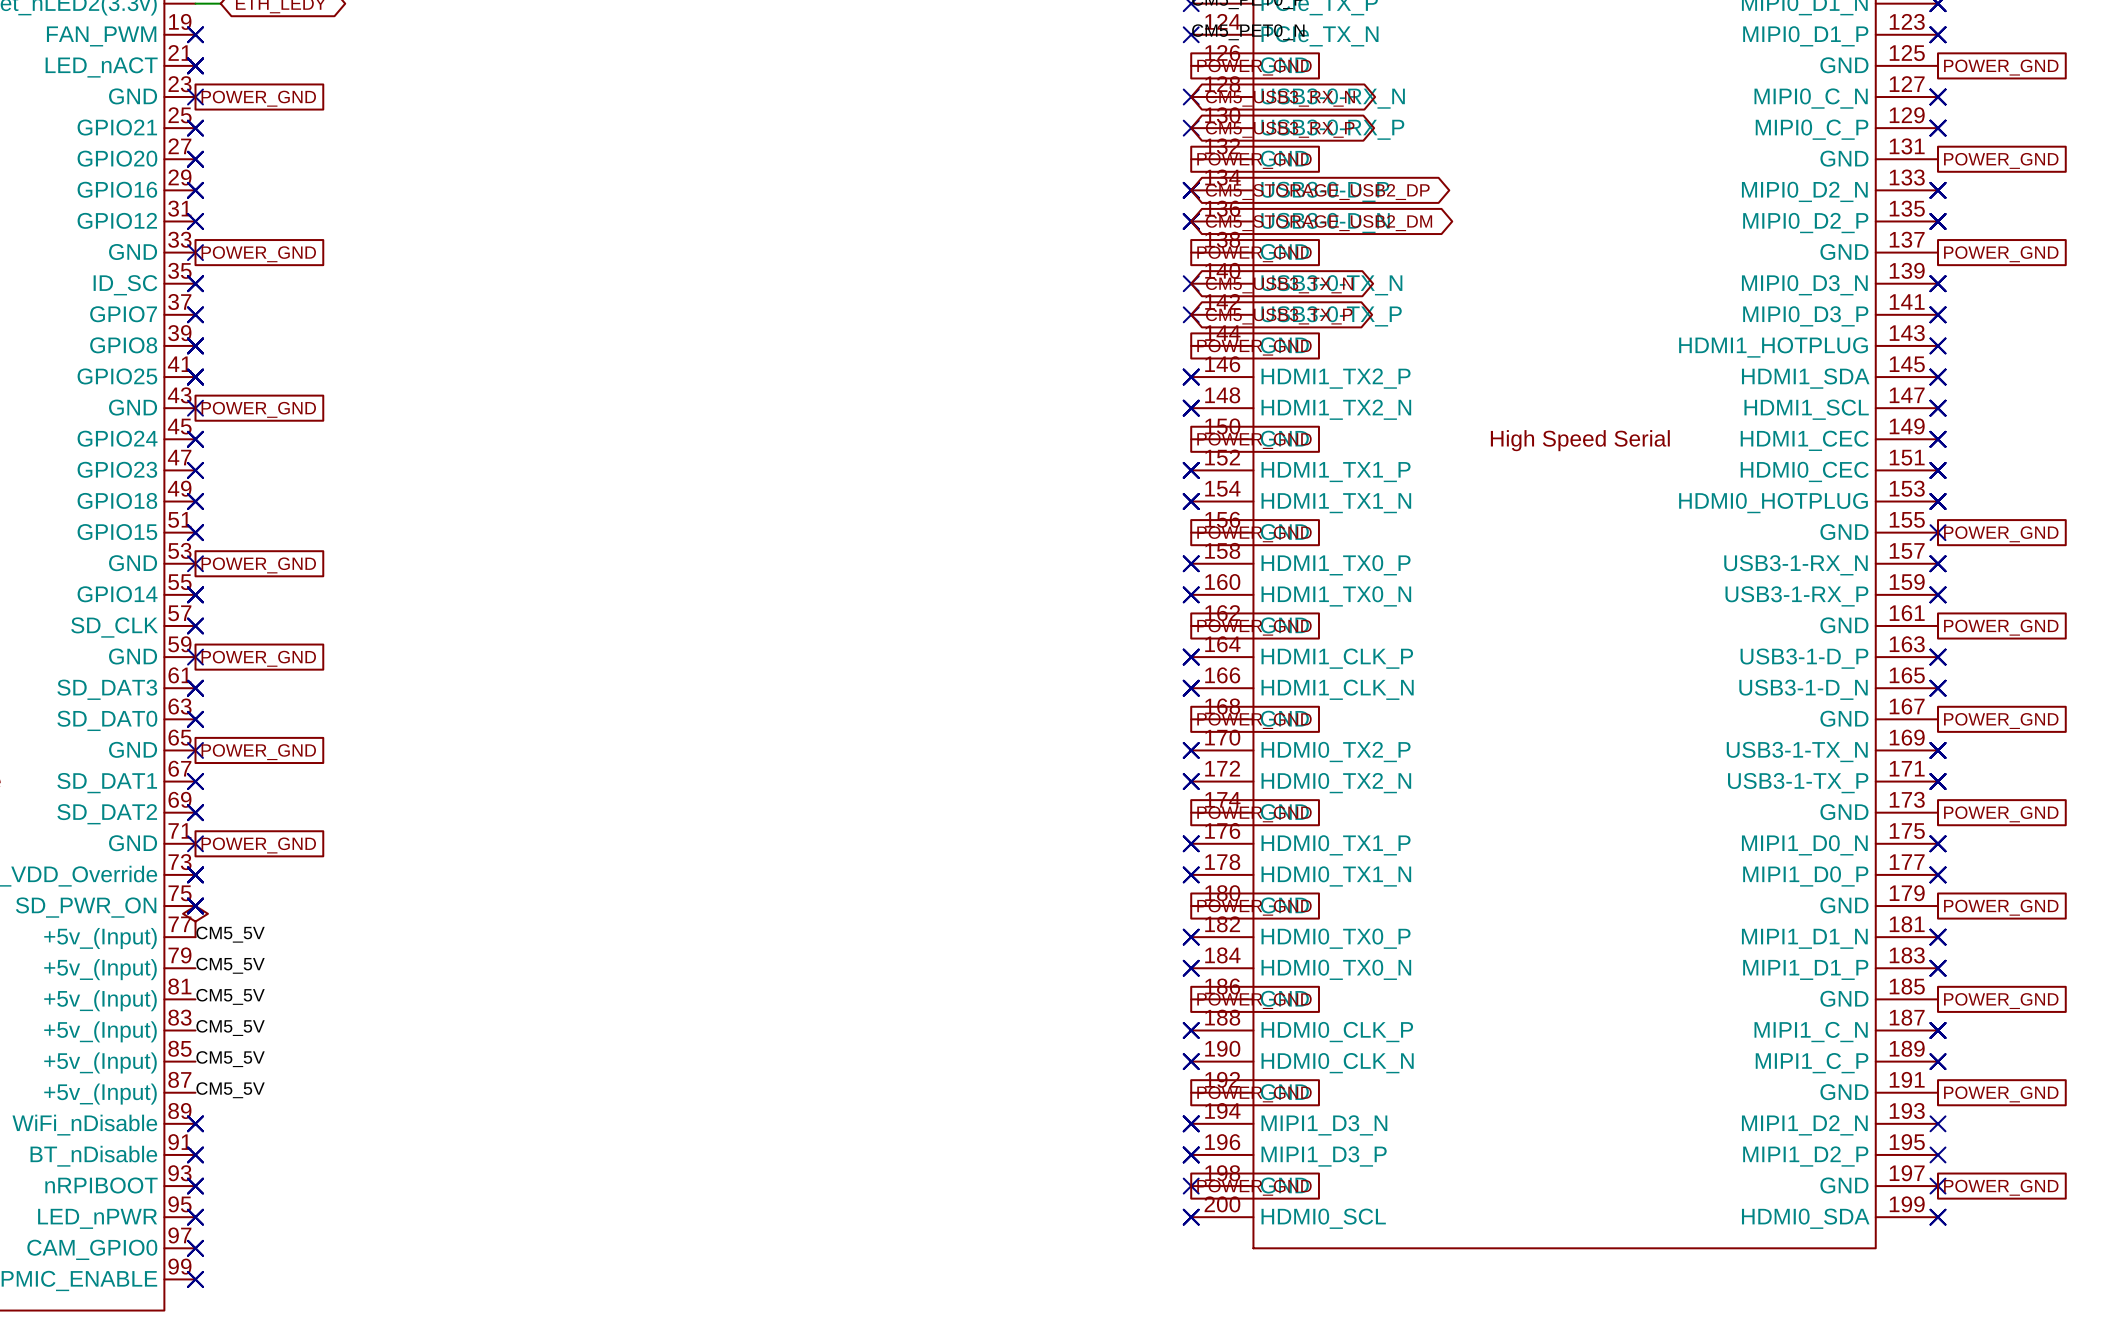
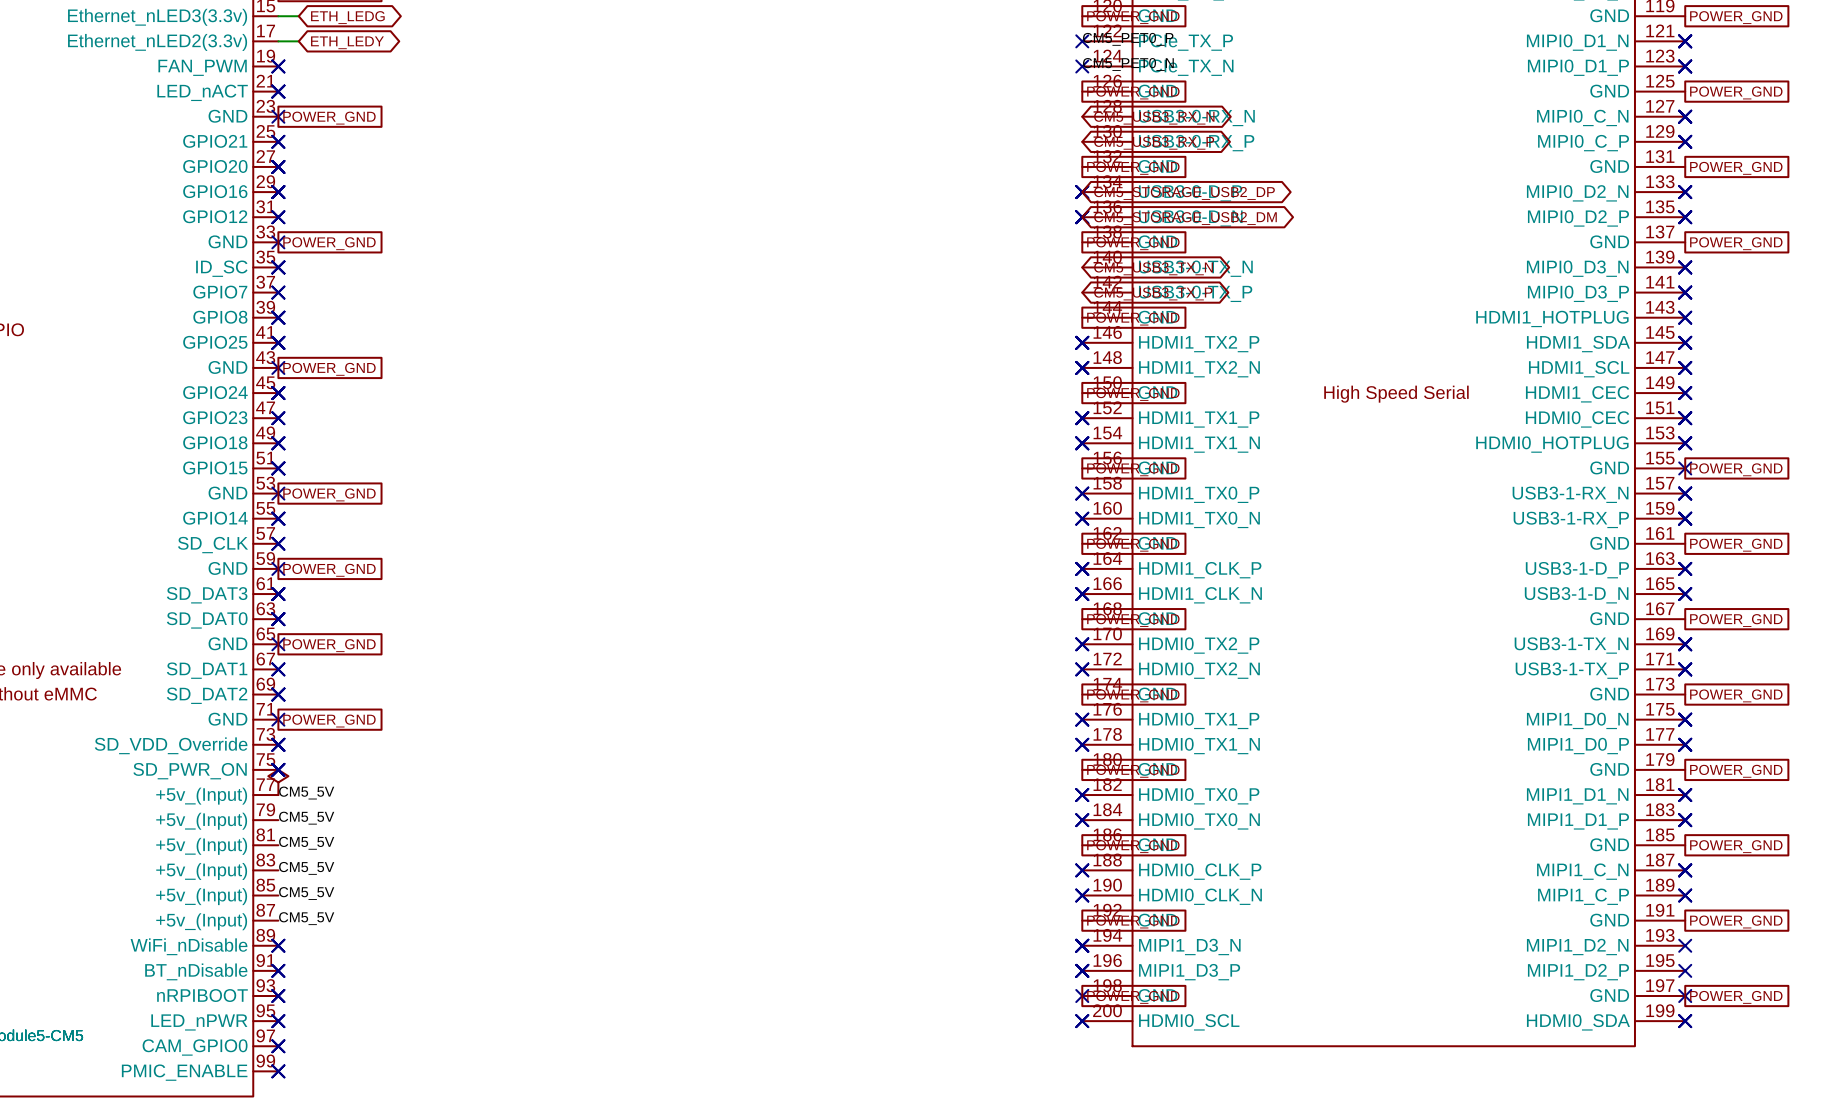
no-connect mark: (1191, 97) -> none
no-connect mark: (1191, 128) -> none
no-connect mark: (1191, 283) -> none
no-connect mark: (1191, 314) -> none

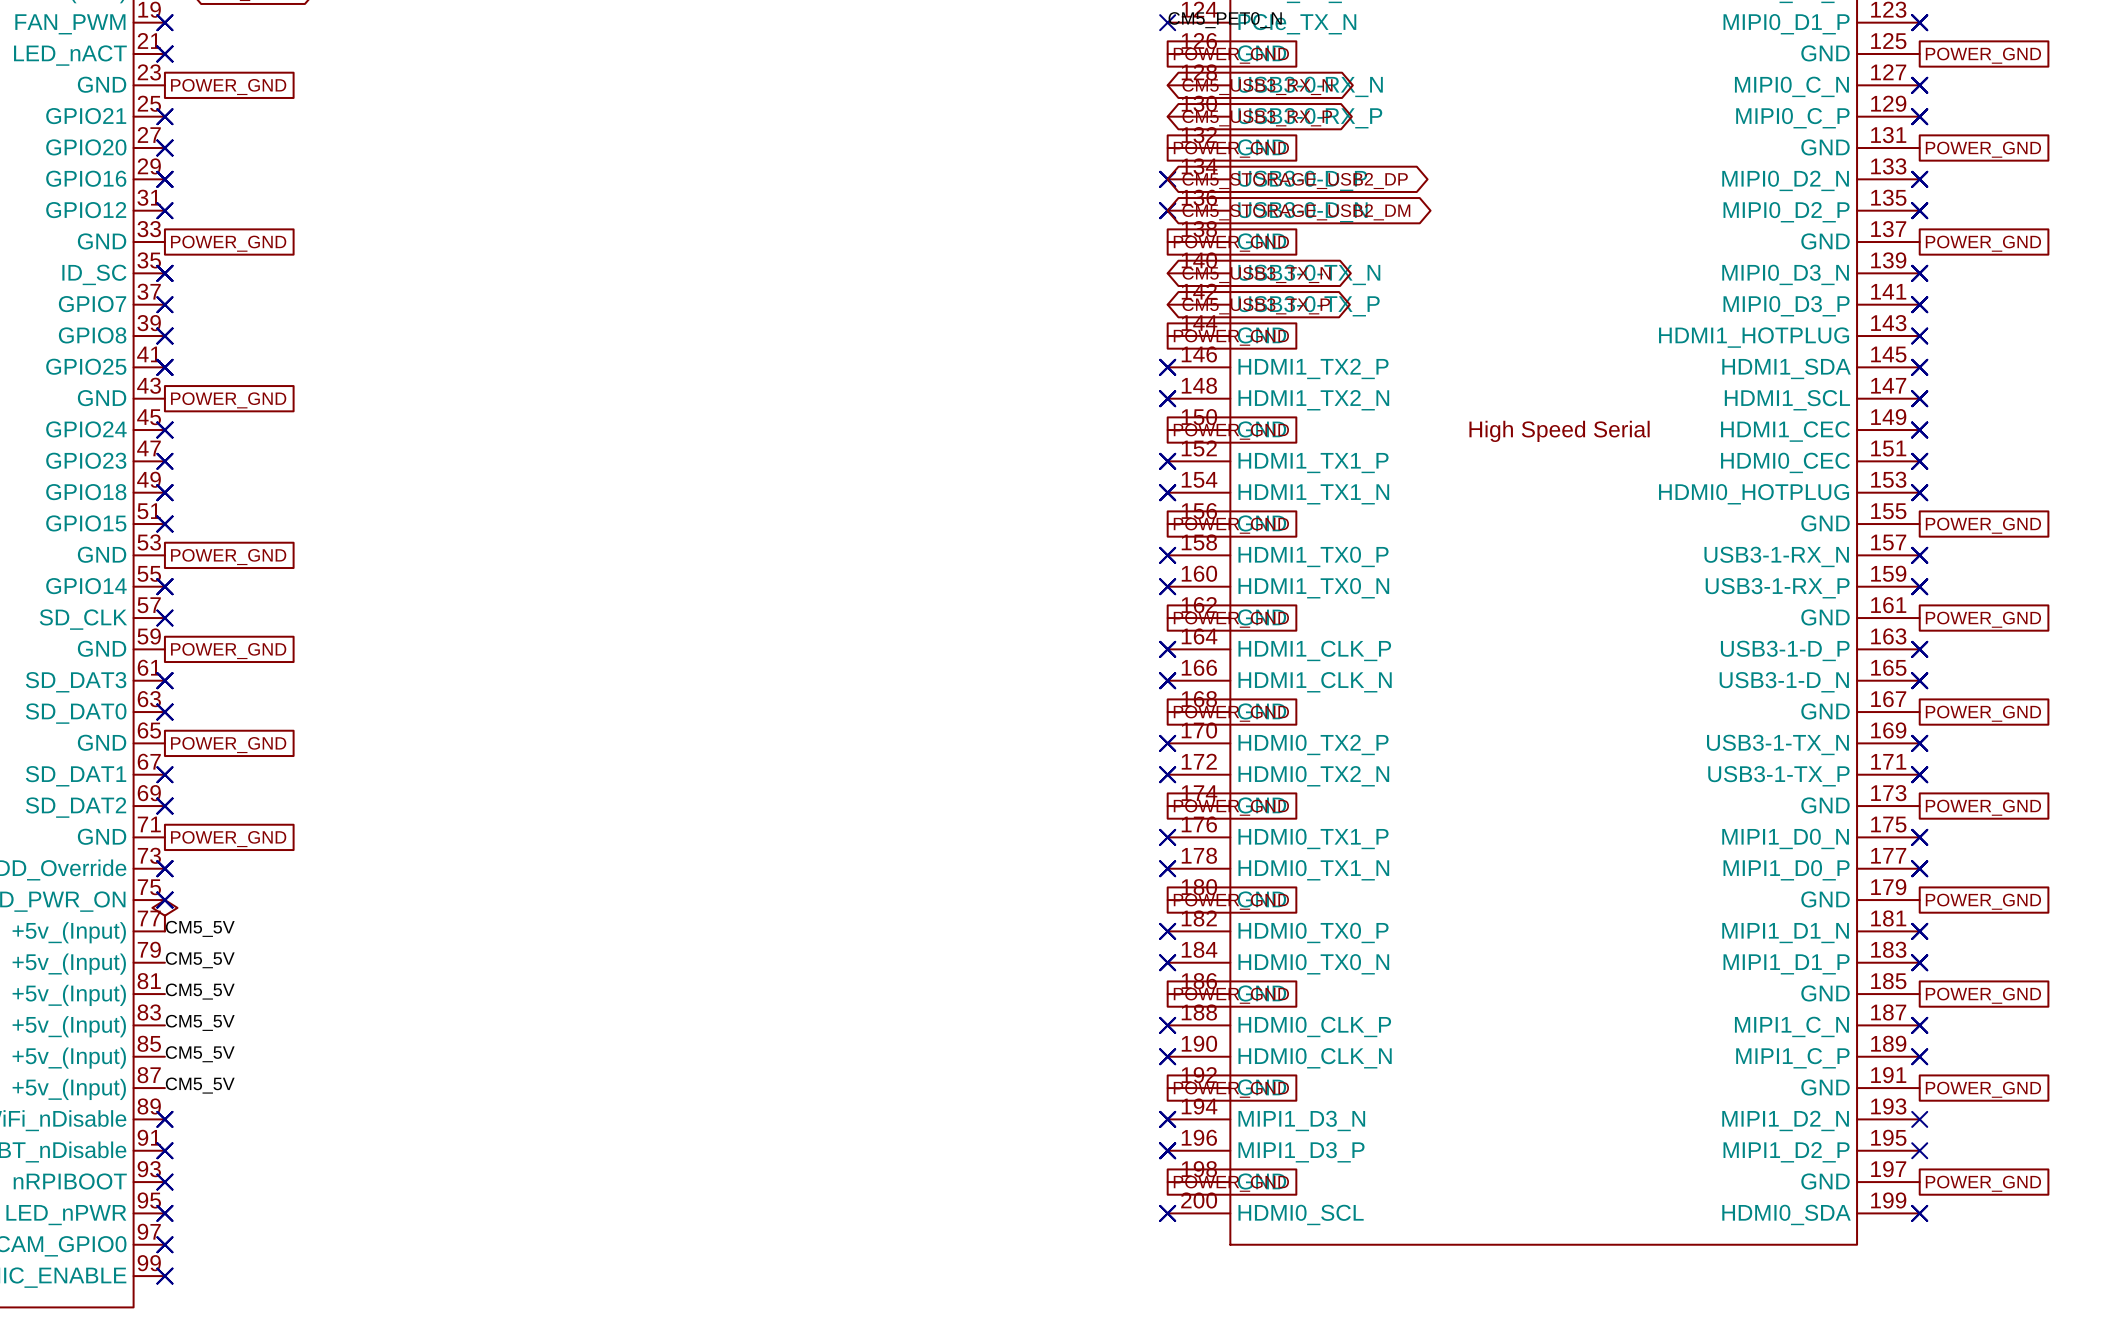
no-connect mark: (278, 116) -> none
no-connect mark: (278, 242) -> none
no-connect mark: (278, 367) -> none
no-connect mark: (1685, 468) -> none
no-connect mark: (278, 493) -> none
no-connect mark: (278, 568) -> none
no-connect mark: (278, 644) -> none
no-connect mark: (278, 719) -> none
no-connect mark: (1082, 996) -> none
no-connect mark: (1685, 996) -> none

